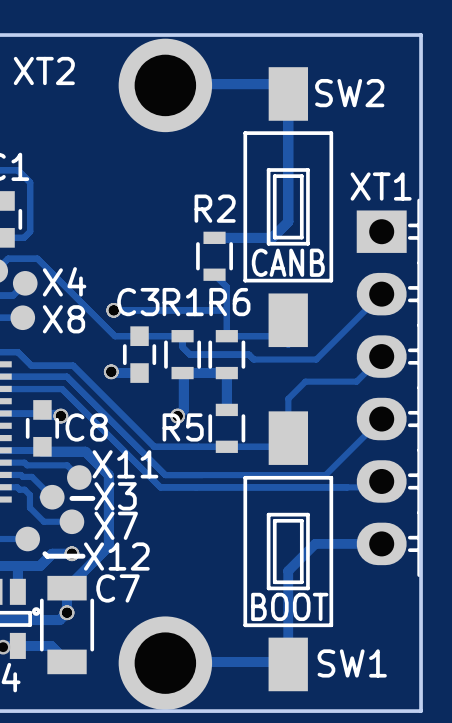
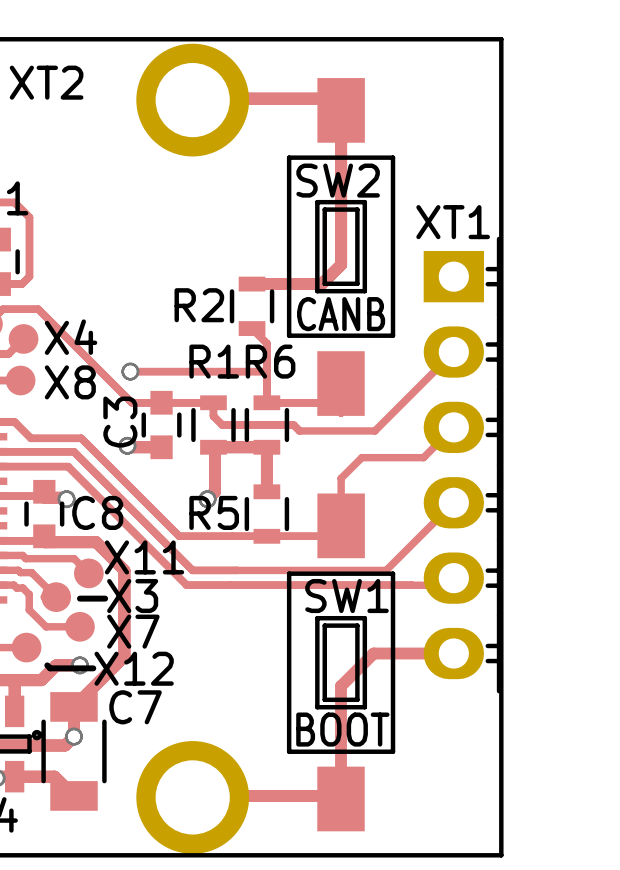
SW2 name position: SW2 (349, 93) -> SW2 (338, 180)
R2 name position: R2 (215, 208) -> R2 (199, 305)
C3 name rotation: 0° (138, 302) -> 90° counterclockwise (120, 422)
SW1 name position: SW1 (352, 663) -> SW1 (347, 596)

